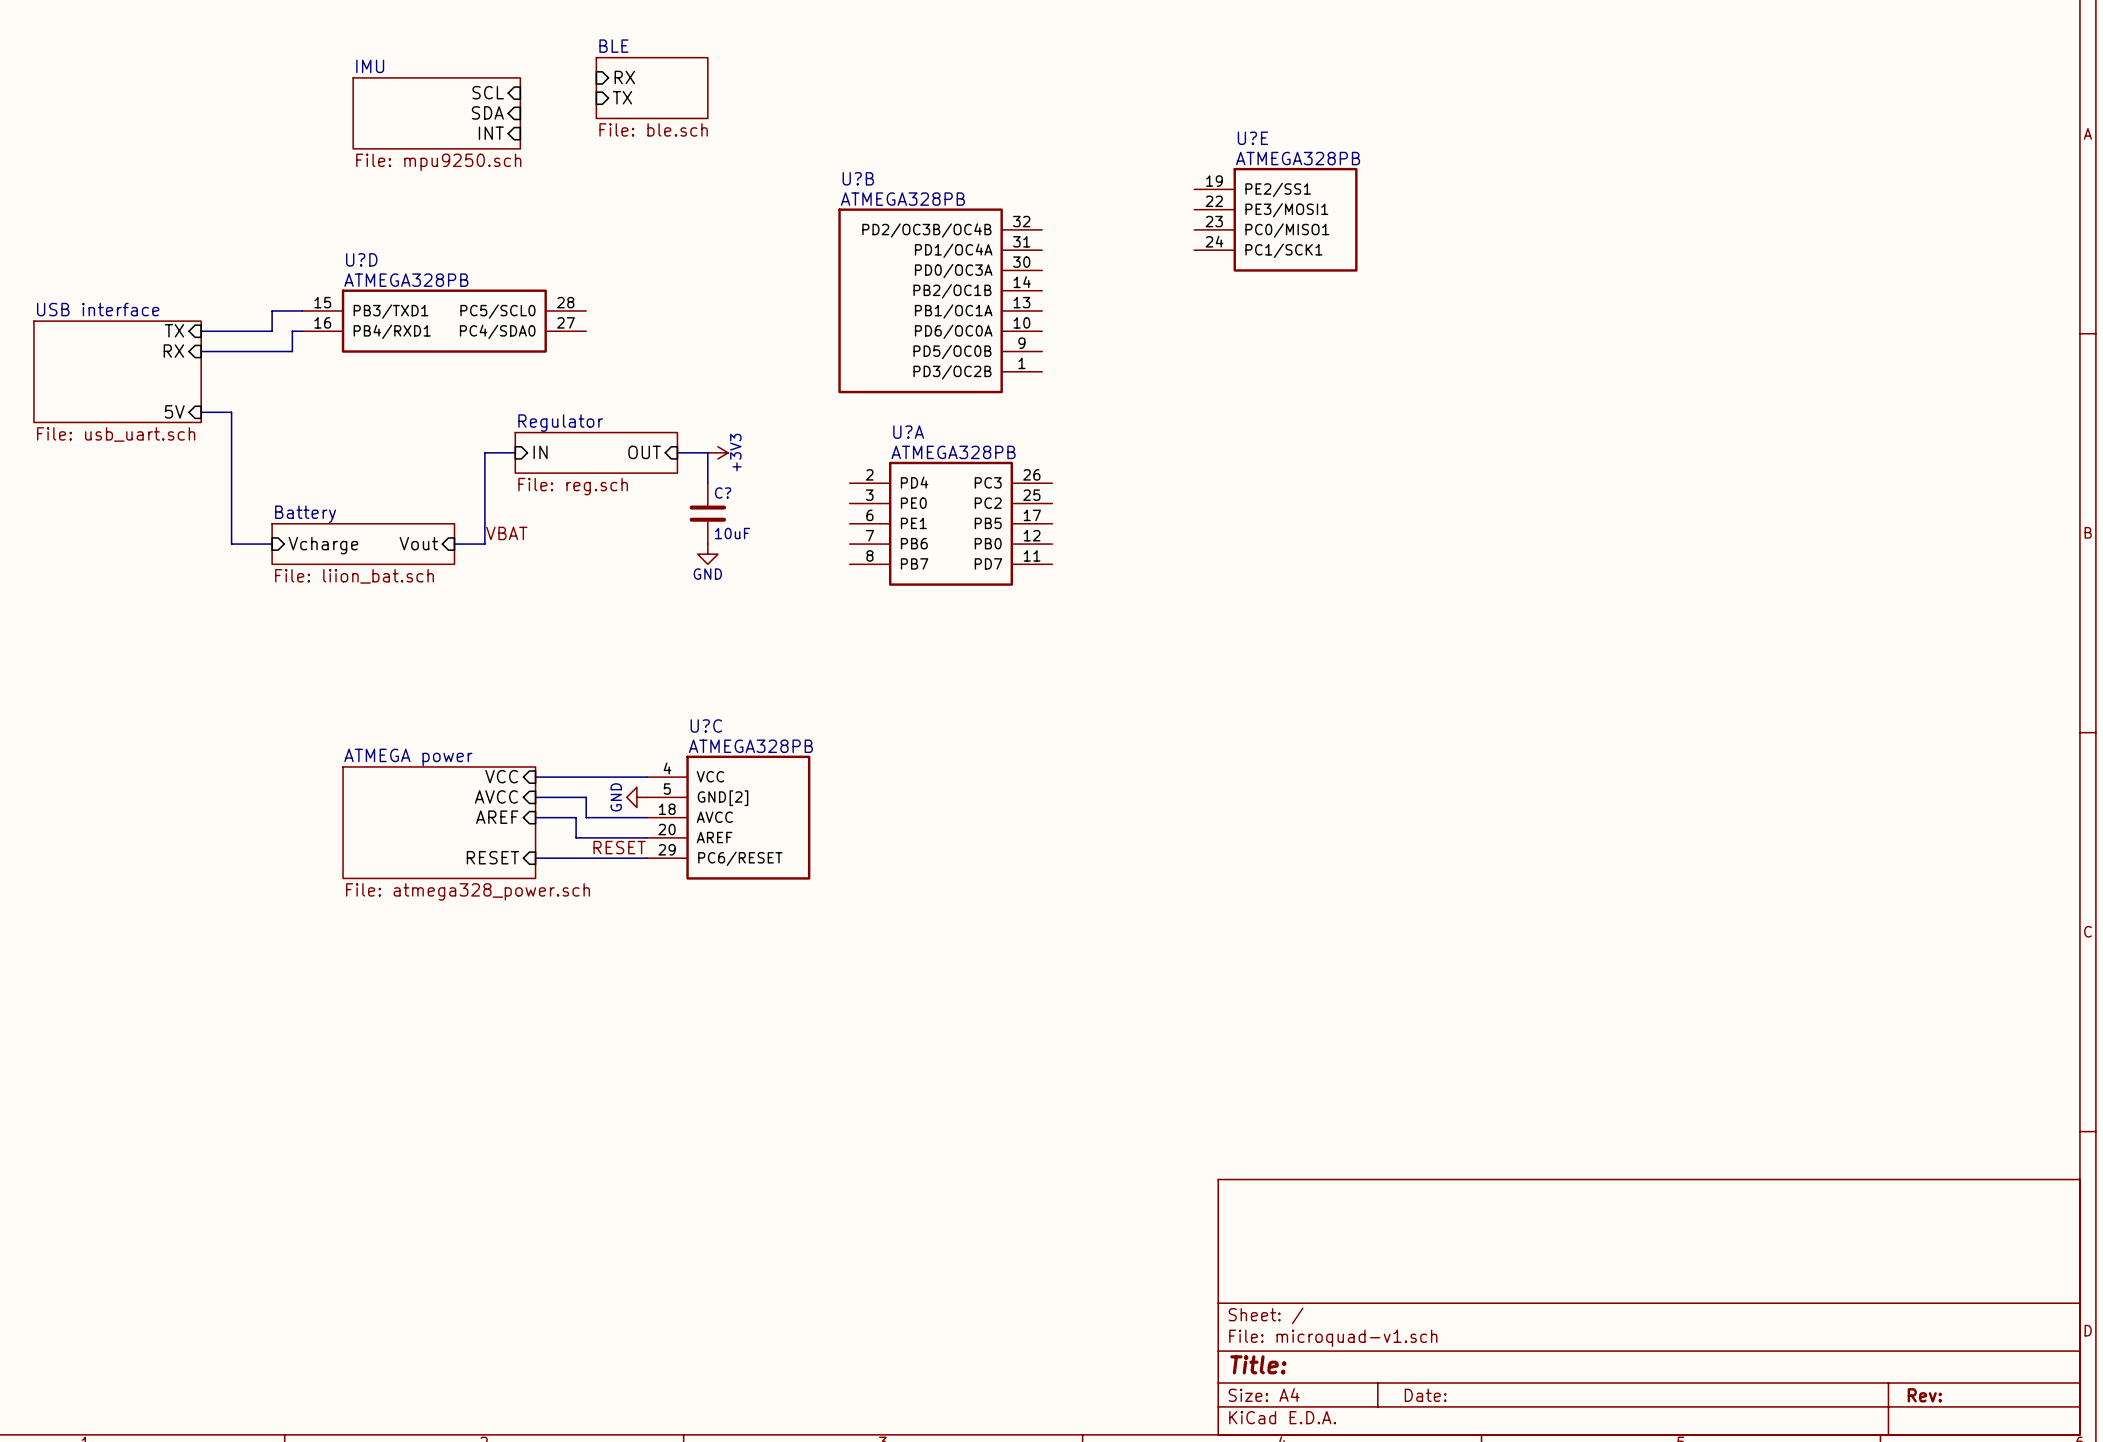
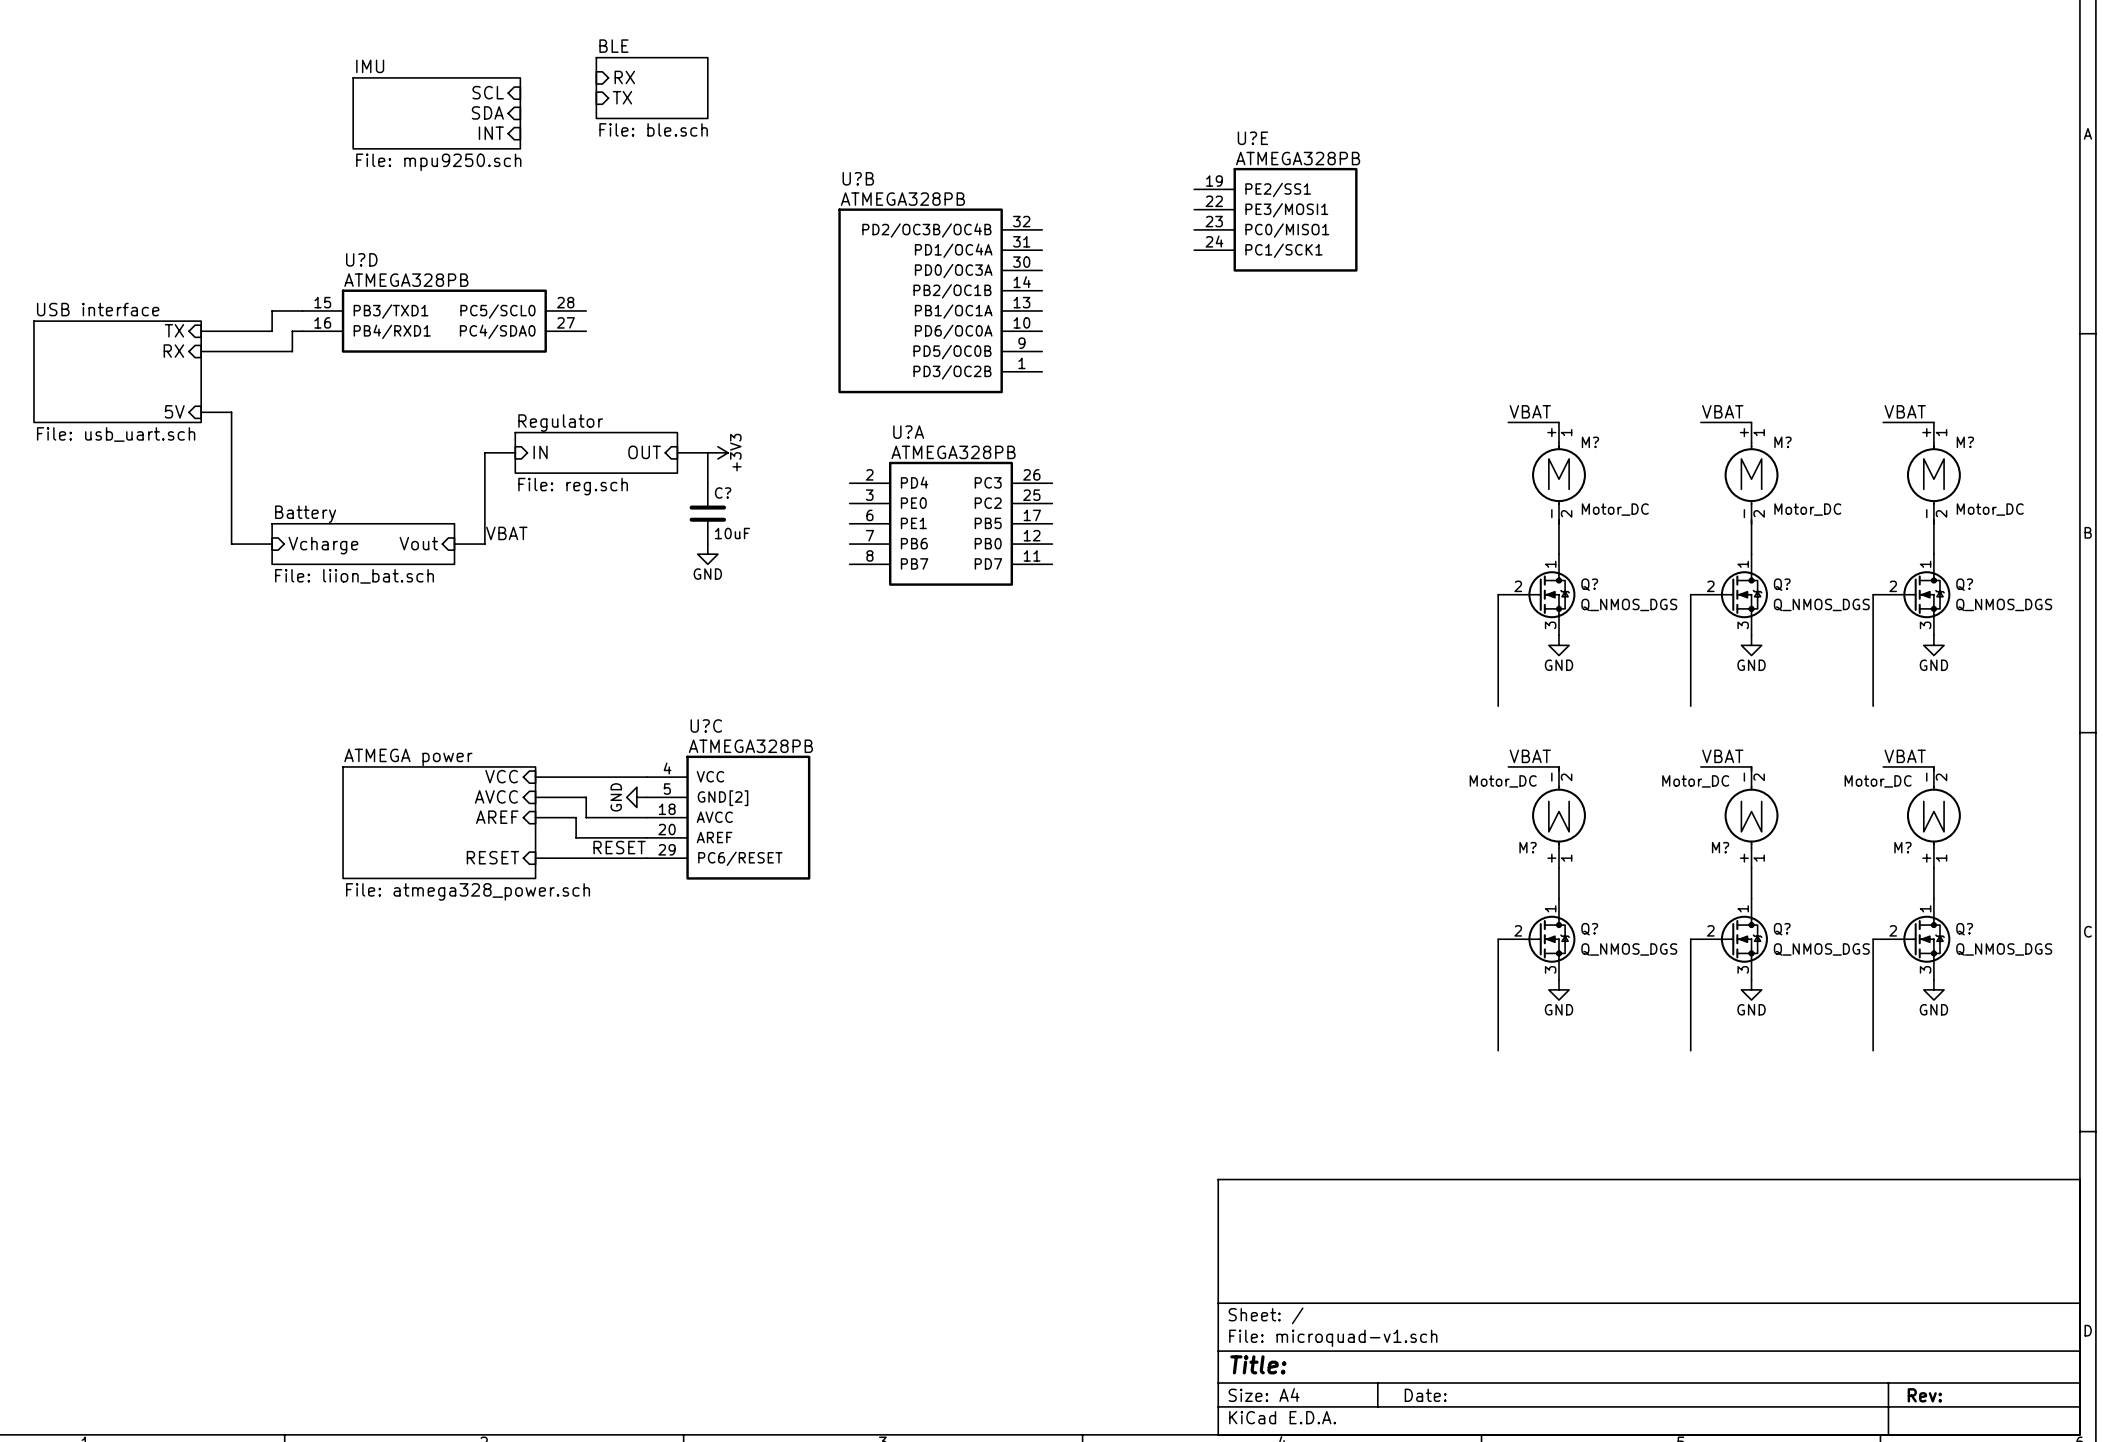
label: none -> VBAT (1530, 411)
label: none -> VBAT (1722, 411)
label: none -> VBAT (1905, 411)
wire: none -> (1508, 422) (1559, 422)
wire: none -> (1700, 422) (1751, 422)
wire: none -> (1883, 422) (1933, 422)
M?: none -> Motor_DC (1559, 473)
M?: none -> Motor_DC (1751, 473)
M?: none -> Motor_DC (1933, 473)
wire: none -> (1559, 523) (1559, 554)
wire: none -> (1751, 523) (1751, 554)
wire: none -> (1933, 523) (1933, 554)
wire: none -> (1498, 594) (1498, 706)
Q?: none -> Q_NMOS_DGS (1536, 594)
wire: none -> (1690, 594) (1690, 706)
Q?: none -> Q_NMOS_DGS (1729, 594)
wire: none -> (1873, 594) (1873, 706)
Q?: none -> Q_NMOS_DGS (1911, 594)
power symbol: none -> GND (1559, 645)
power symbol: none -> GND (1751, 645)
power symbol: none -> GND (1933, 645)
label: none -> VBAT (1530, 756)
label: none -> VBAT (1722, 756)
label: none -> VBAT (1905, 756)
wire: none -> (1508, 766) (1559, 766)
wire: none -> (1700, 766) (1751, 766)
wire: none -> (1883, 766) (1933, 766)
M?: none -> Motor_DC (1559, 817)
M?: none -> Motor_DC (1751, 817)
M?: none -> Motor_DC (1933, 817)
wire: none -> (1559, 868) (1559, 898)
wire: none -> (1751, 868) (1751, 898)
wire: none -> (1933, 868) (1933, 898)
wire: none -> (1498, 939) (1498, 1050)
Q?: none -> Q_NMOS_DGS (1536, 939)
wire: none -> (1690, 939) (1690, 1050)
Q?: none -> Q_NMOS_DGS (1729, 939)
wire: none -> (1873, 939) (1873, 1050)
Q?: none -> Q_NMOS_DGS (1911, 939)
power symbol: none -> GND (1559, 989)
power symbol: none -> GND (1751, 989)
power symbol: none -> GND (1933, 989)

